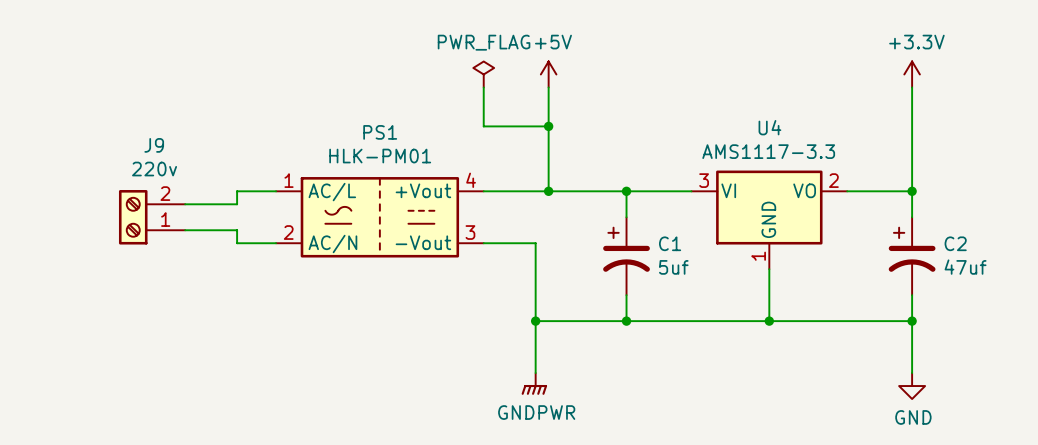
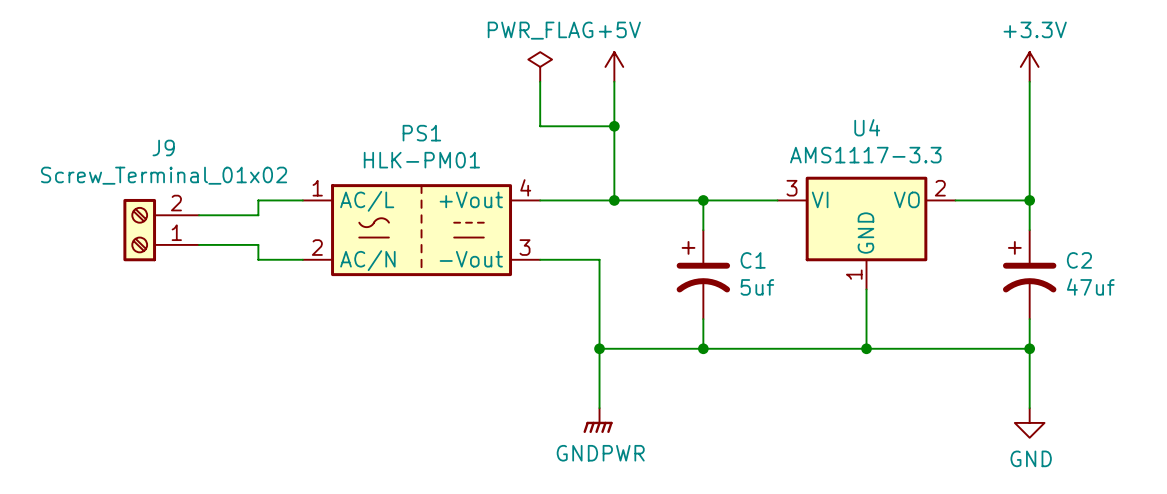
J9 value: 220v (154, 169) -> Screw_Terminal_01x02 (164, 175)

